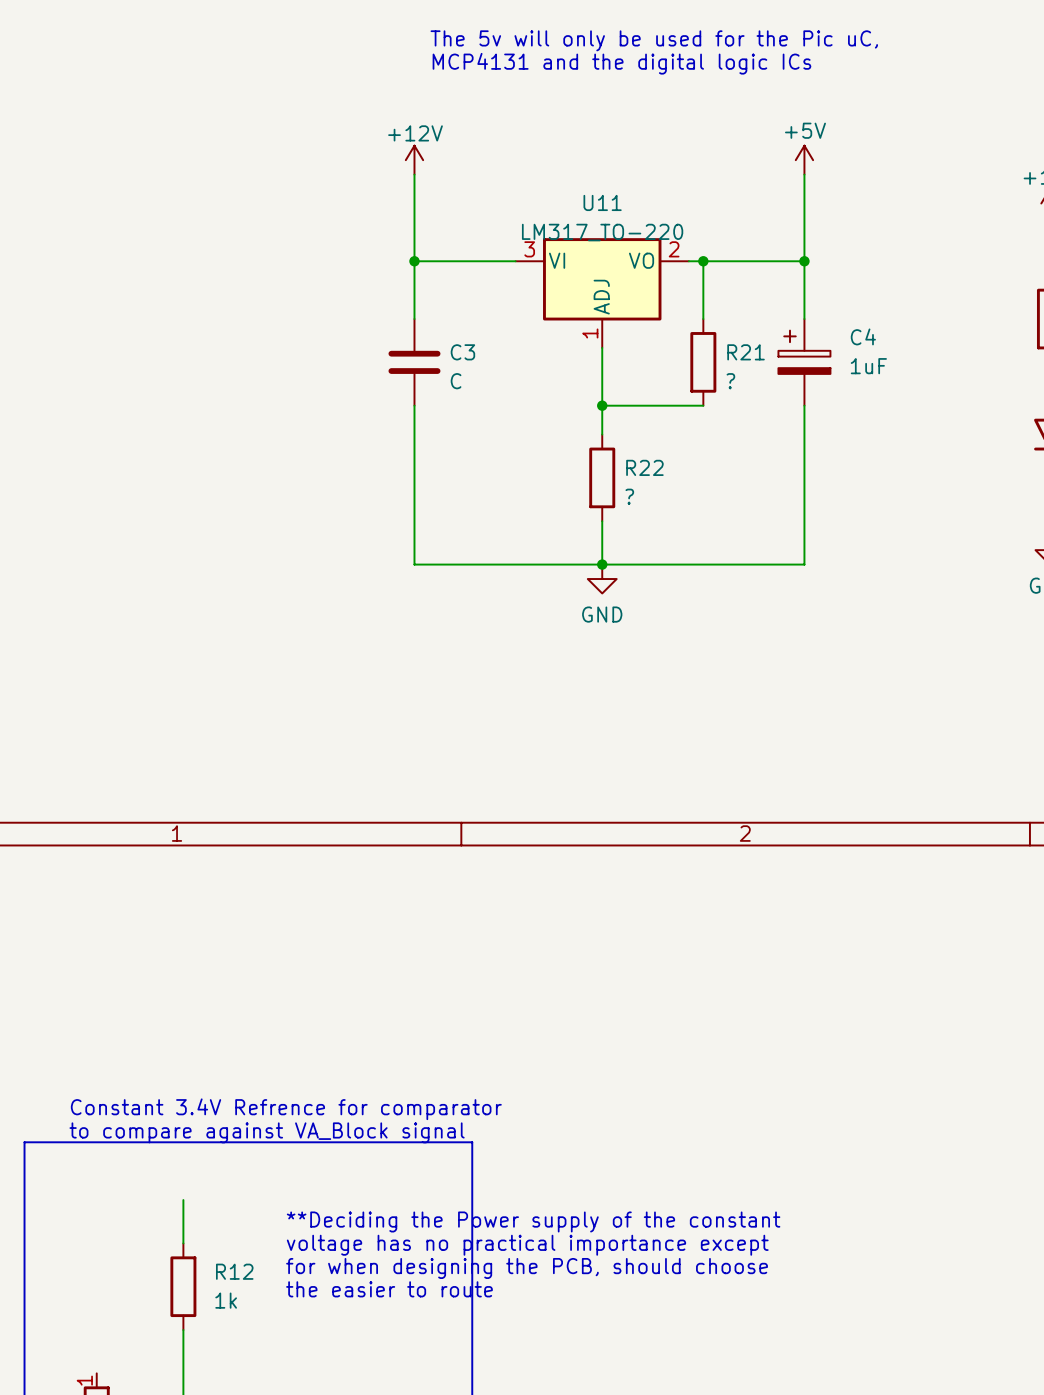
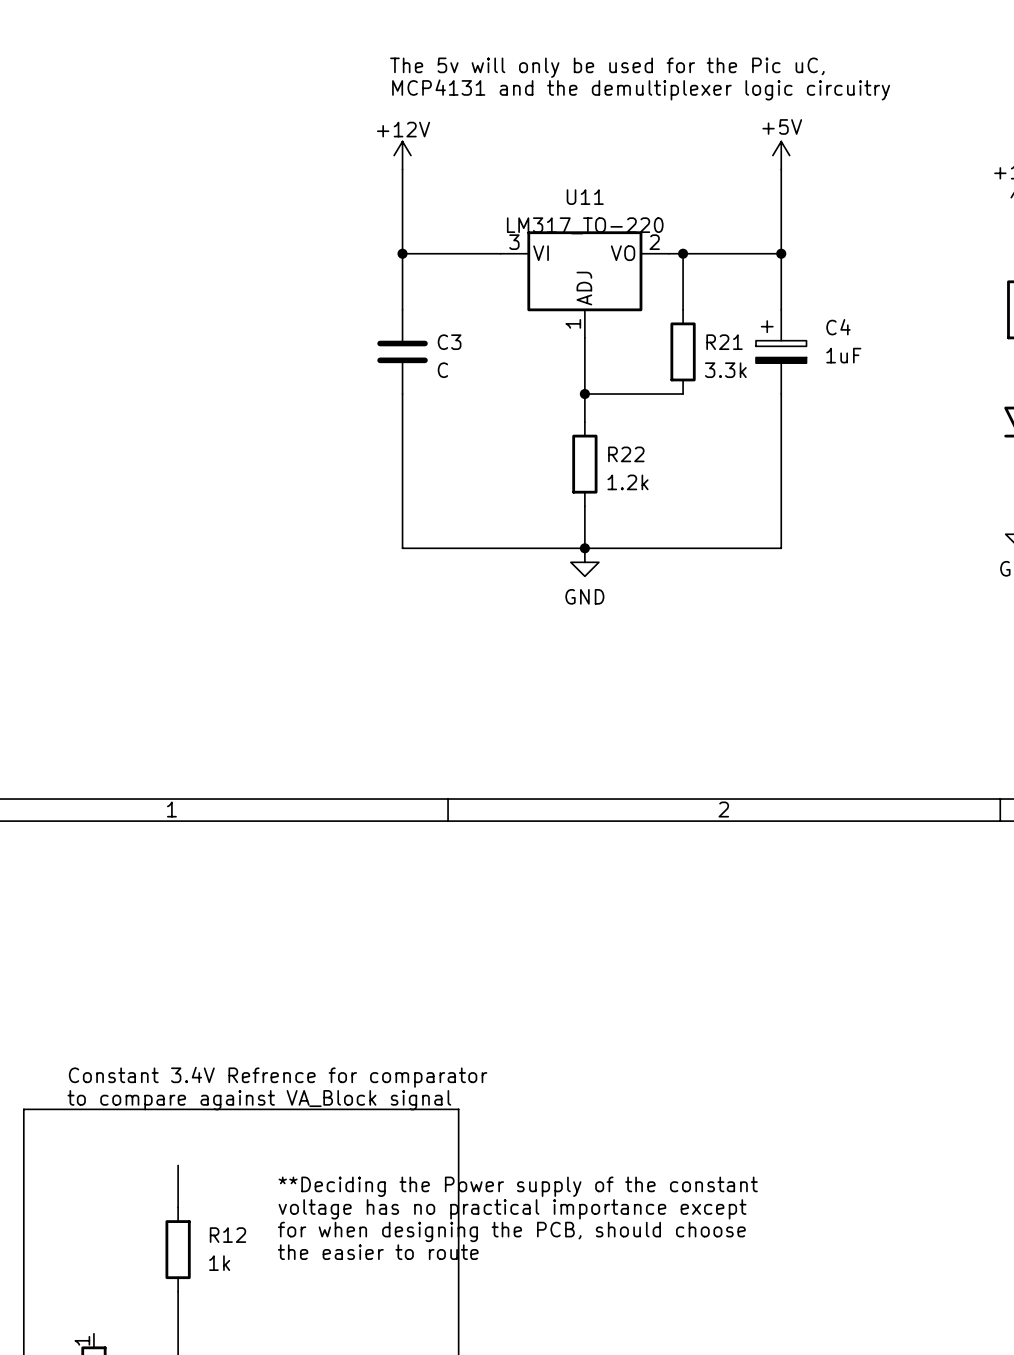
text position: The 5v will only be used for the Pic uC, (654, 40) -> The 5v will only be used for the Pic uC, (607, 67)
text: MCP4131 and the digital logic ICs (621, 63) -> MCP4131 and the demultiplexer logic circuitry (641, 89)
R21 value: ? (730, 381) -> 3.3k (725, 370)
R22 value: ? (629, 496) -> 1.2k (628, 482)

